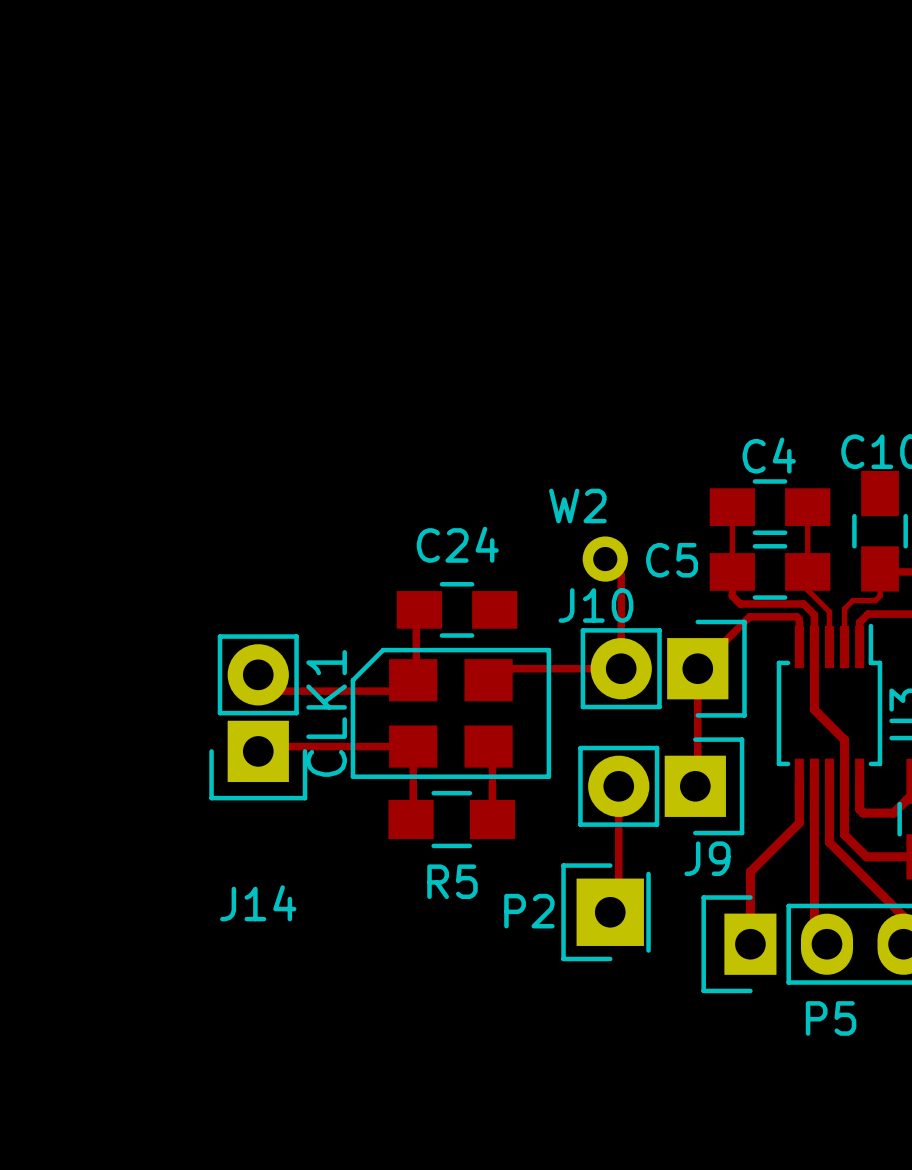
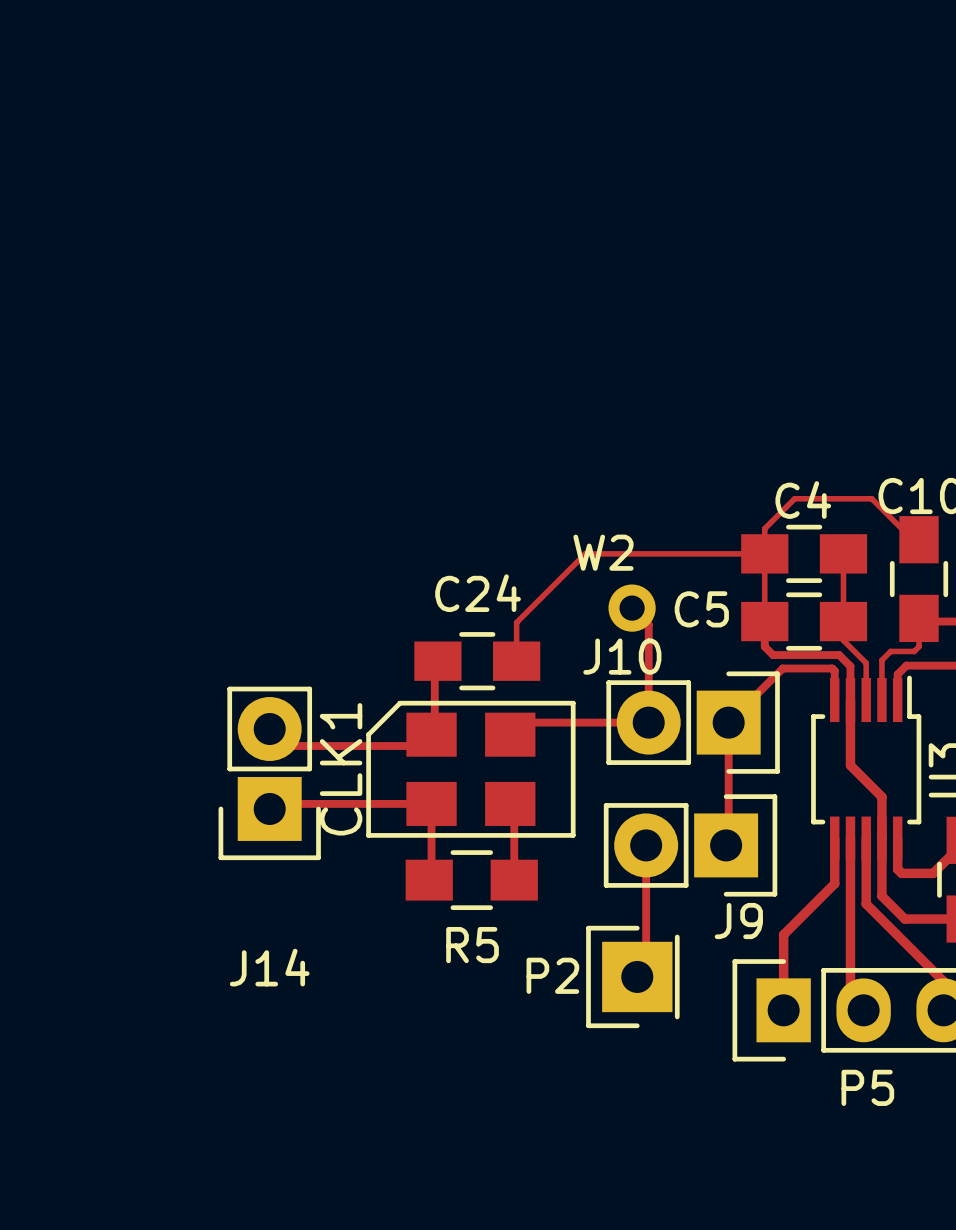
top track: none -> (912, 539) (871, 498) (794, 498) (764, 528) (764, 553) (585, 553) (516, 622) (516, 661)

